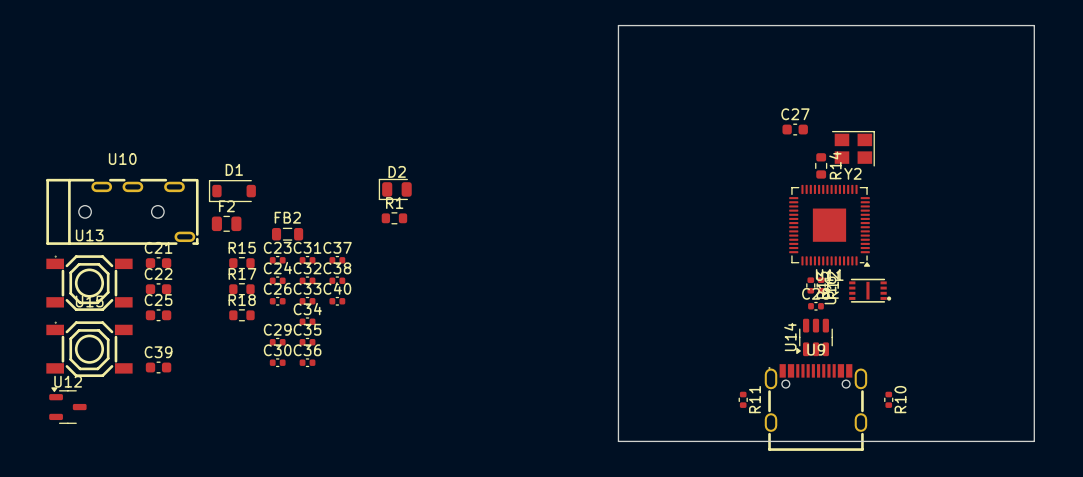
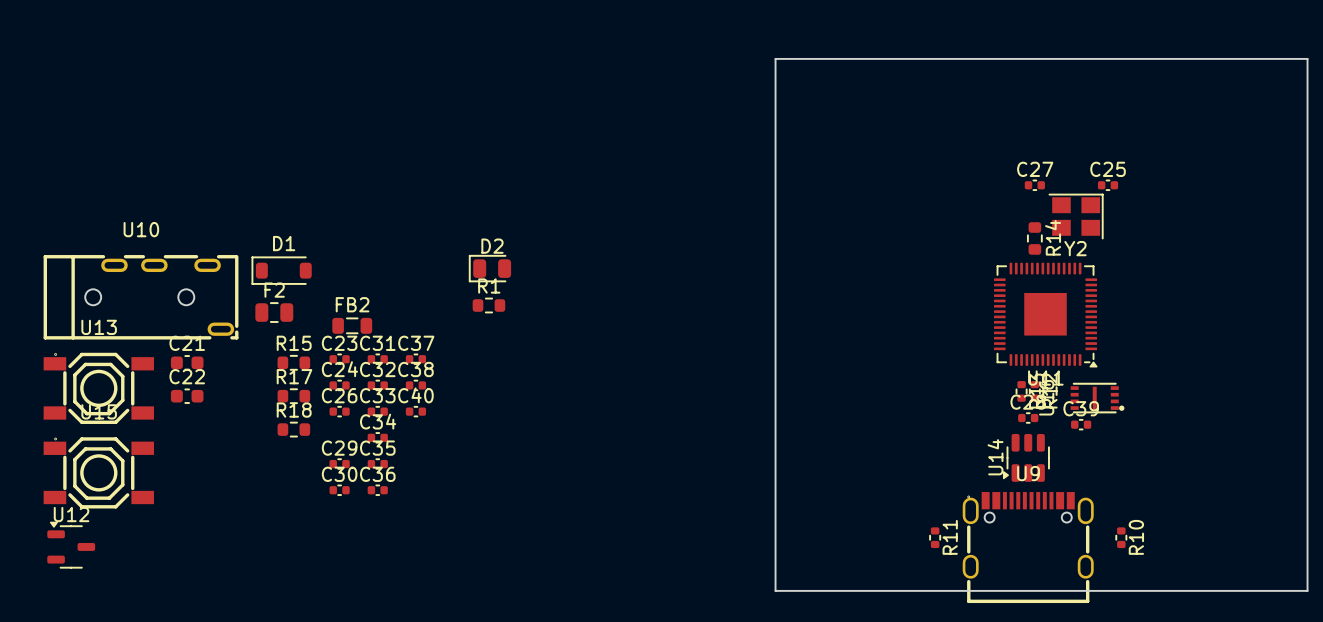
C27 footprint: [782, 123, 808, 136] -> [1024, 179, 1045, 191]
C25 footprint: [145, 309, 172, 322] -> [1097, 179, 1119, 191]
C39 footprint: [145, 361, 172, 374] -> [1071, 419, 1092, 431]

